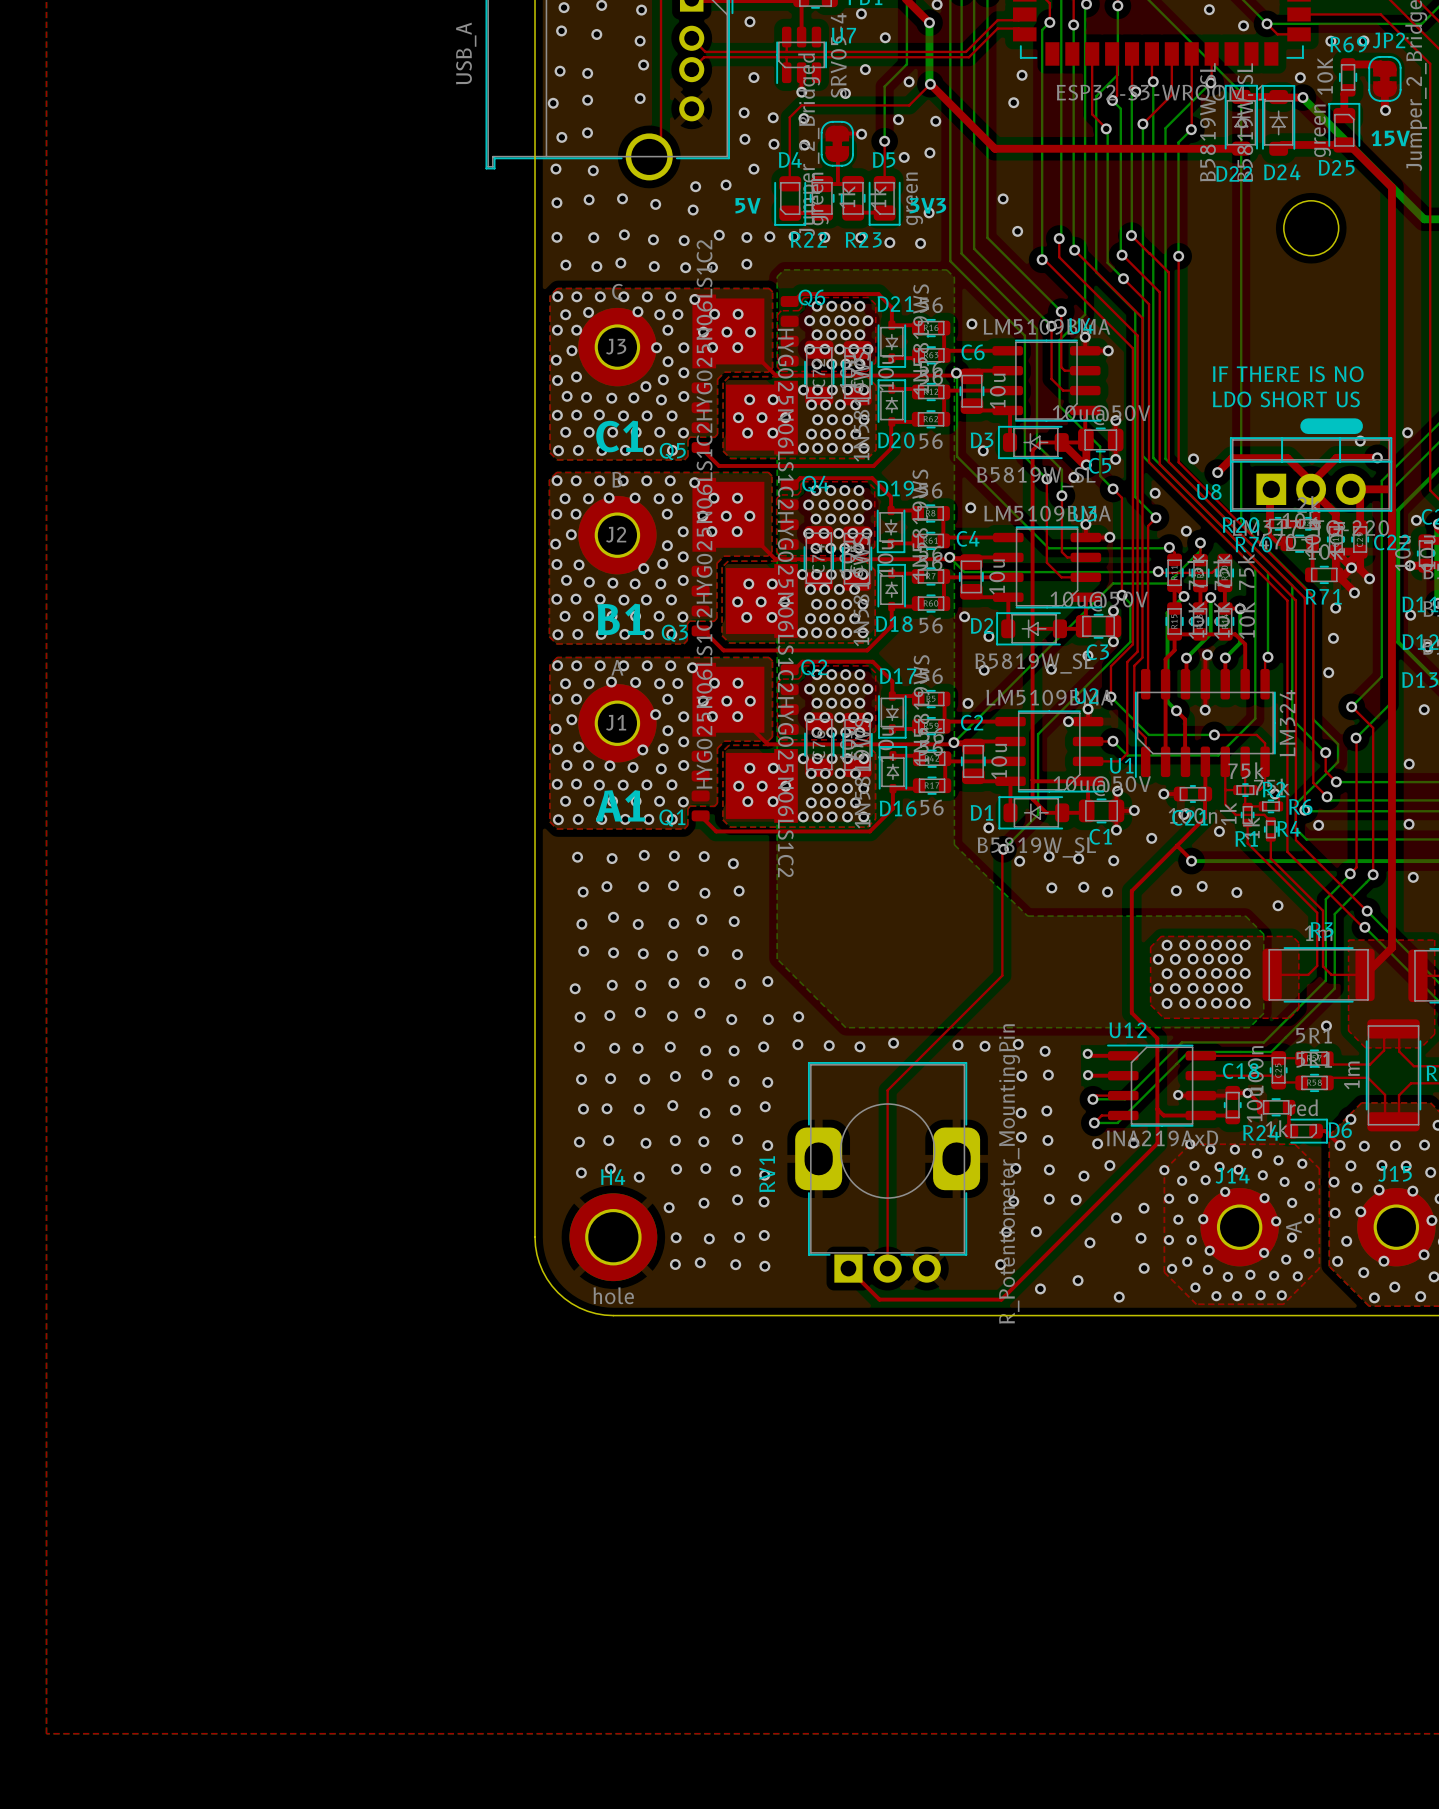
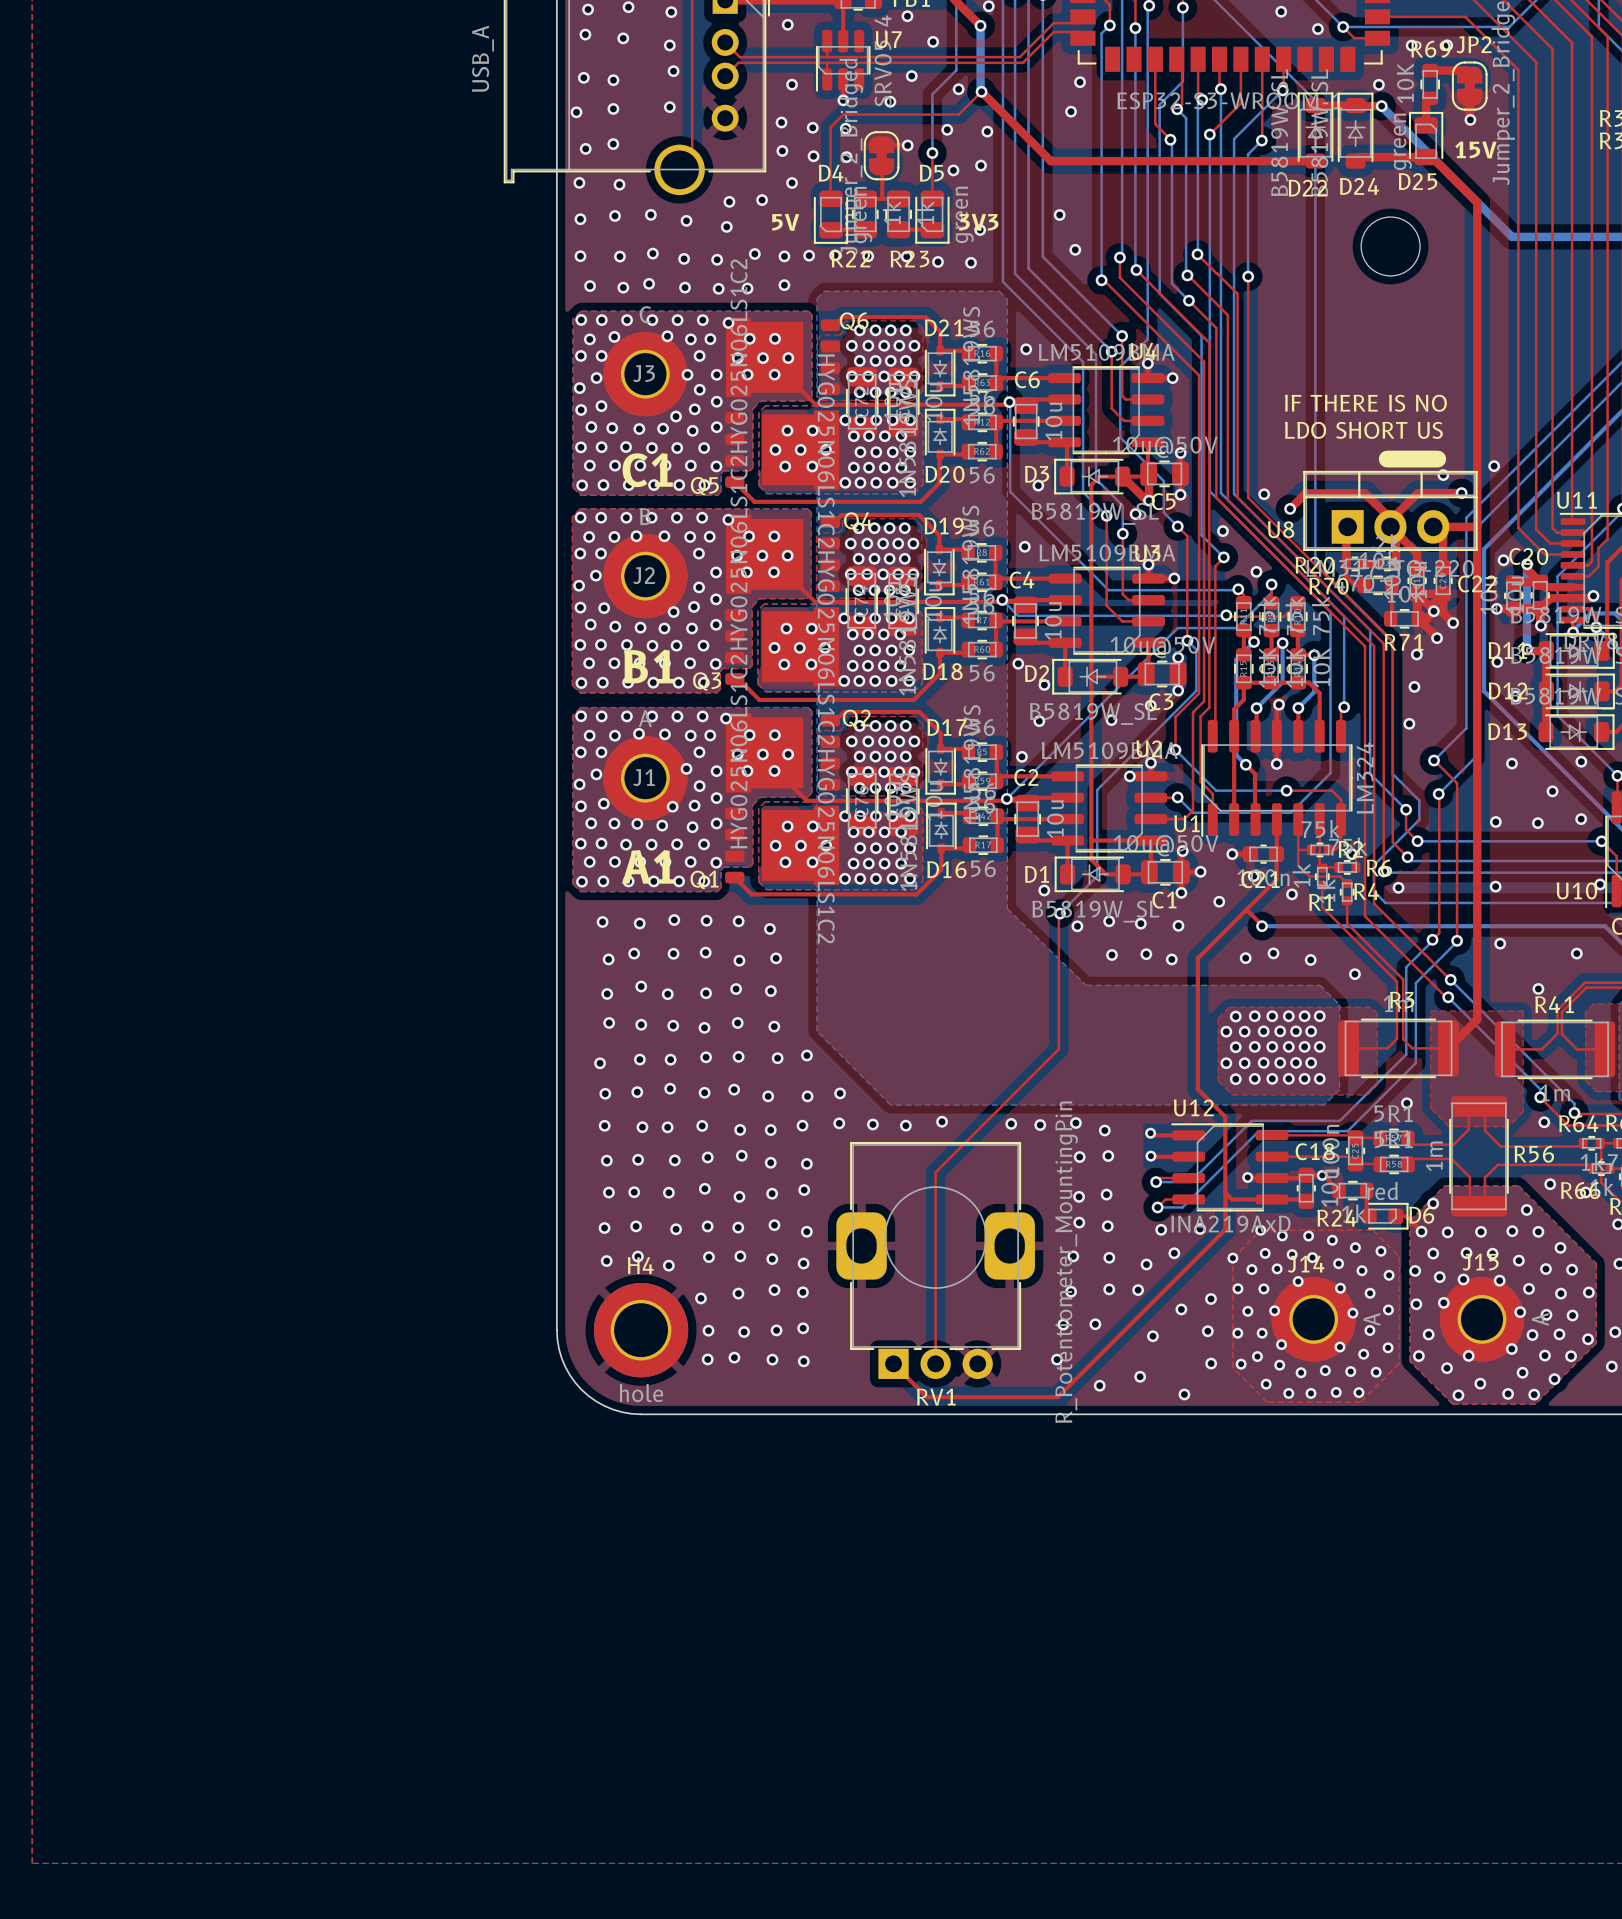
RV1 name rotation: 0° (767, 1174) -> 90° clockwise (936, 1397)
RV1 name position: RV1 (767, 1174) -> RV1 (936, 1397)

